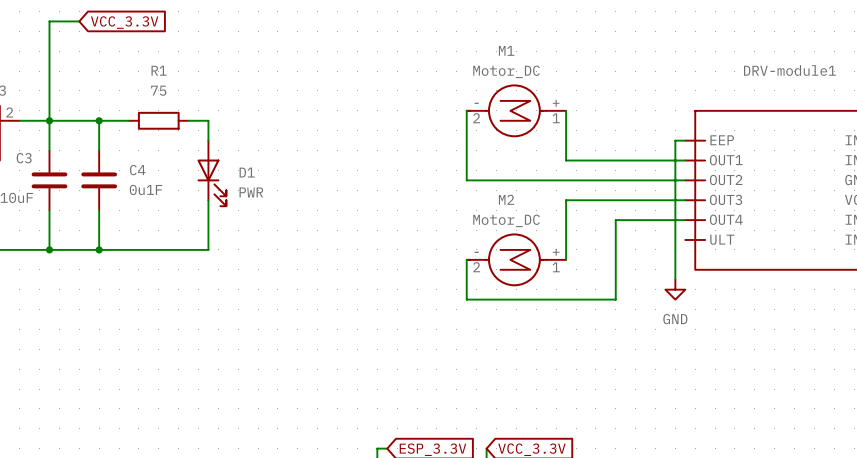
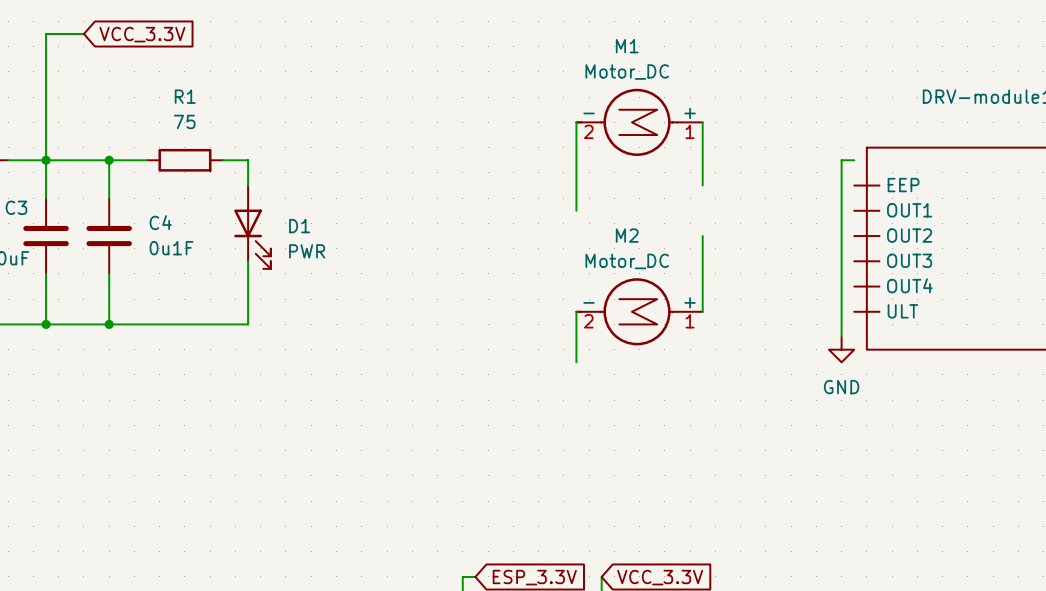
wire: none -> (576, 122) (576, 147)
wire: none -> (702, 122) (702, 147)
M1 position: (516, 110) -> (639, 122)
wire: (566, 140) (566, 160) (685, 160) -> none
wire: (675, 140) (685, 140) -> (841, 185) (841, 160) (854, 160)
wire: (466, 160) (466, 180) (685, 180) -> none
wire: (566, 200) (685, 200) -> (702, 261) (702, 236)
wire: (685, 220) (615, 220) (615, 299) (466, 299) (466, 279) -> none
wire: (566, 239) (566, 259) -> (576, 311) (576, 337)
M2 position: (516, 259) -> (639, 311)
power symbol position: GND (675, 289) -> GND (841, 349)

